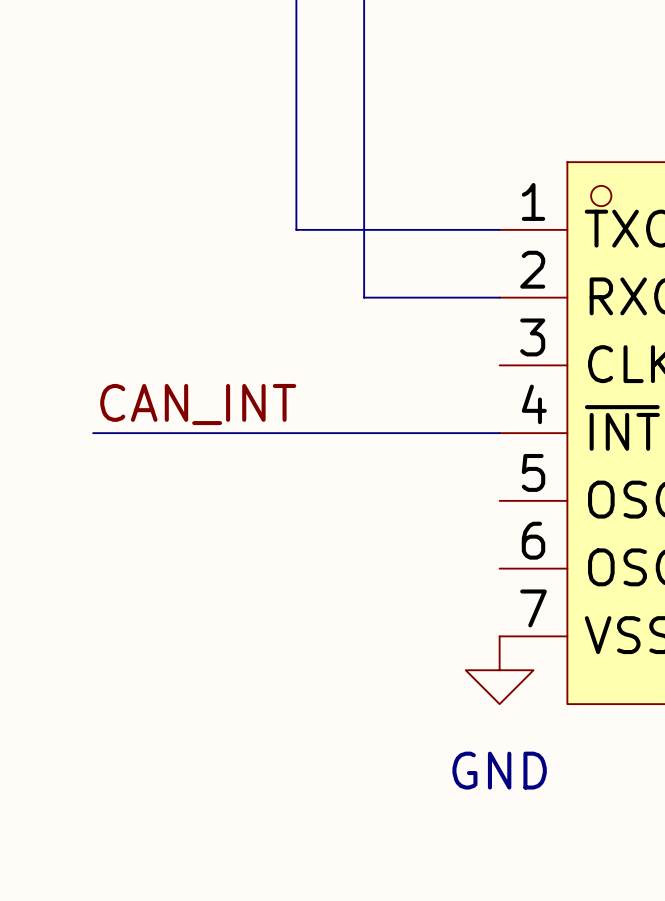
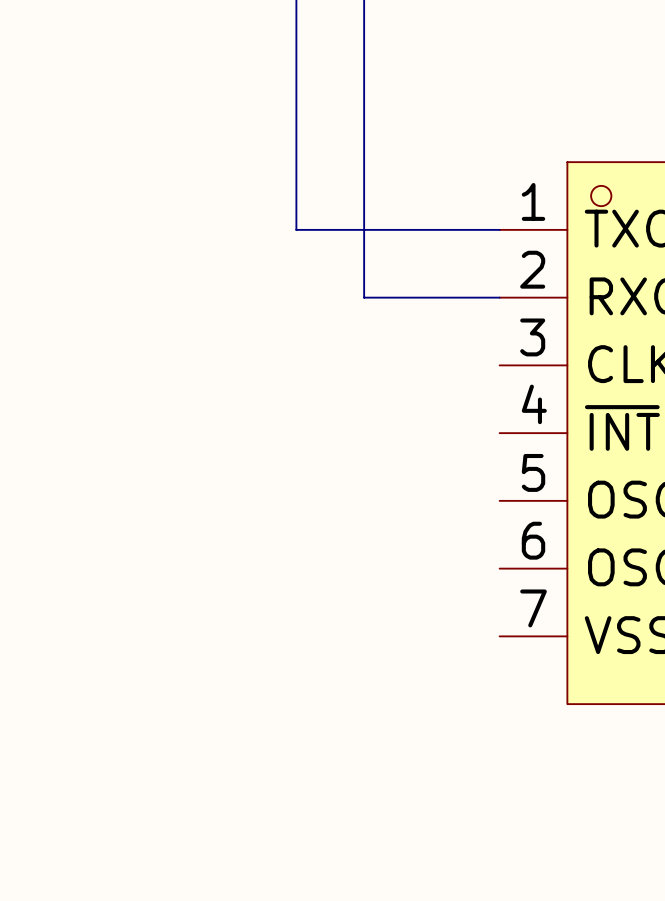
label: CAN_INT (198, 404) -> none
wire: (93, 433) (499, 433) -> none
power symbol: GND (499, 670) -> none

